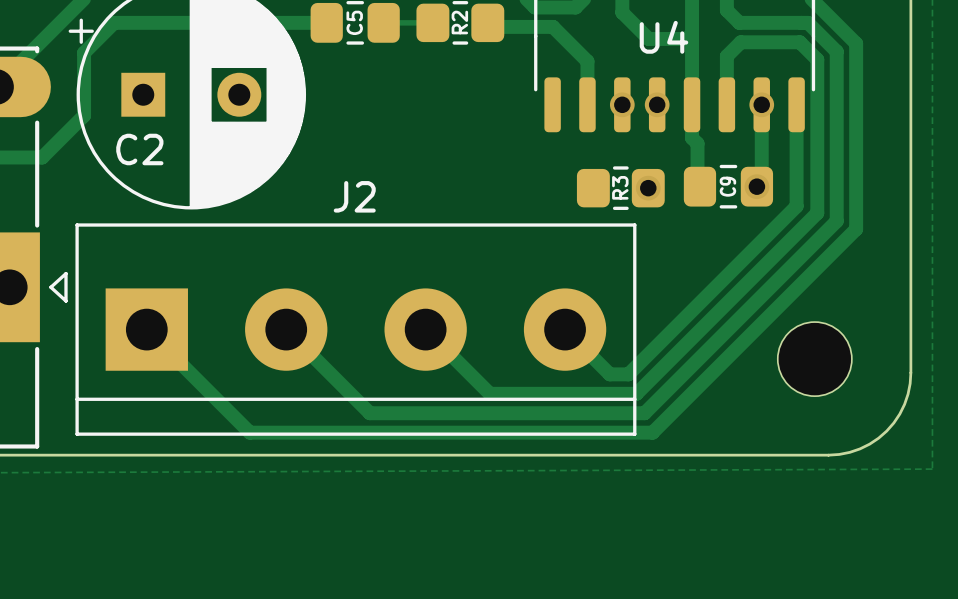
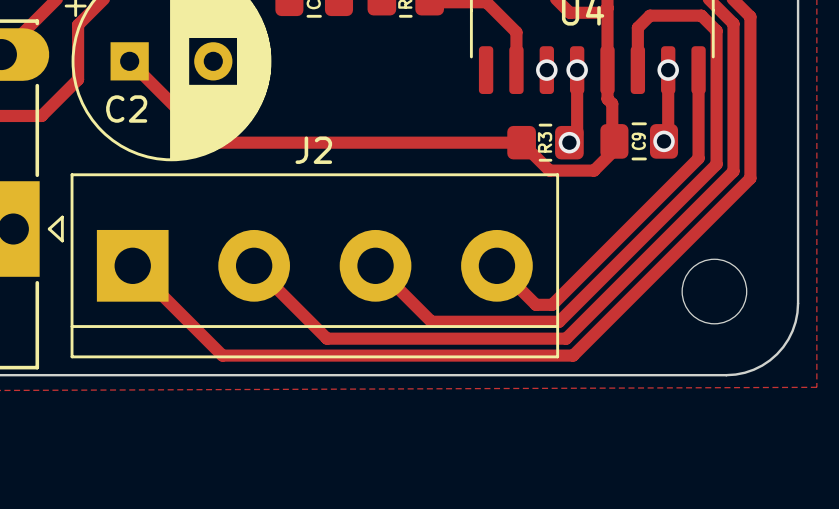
track: none -> (129, 61) (211, 142) (521, 142) (549, 170) (594, 170) (614, 150)
track: none -> (577, 70) (577, 134)

